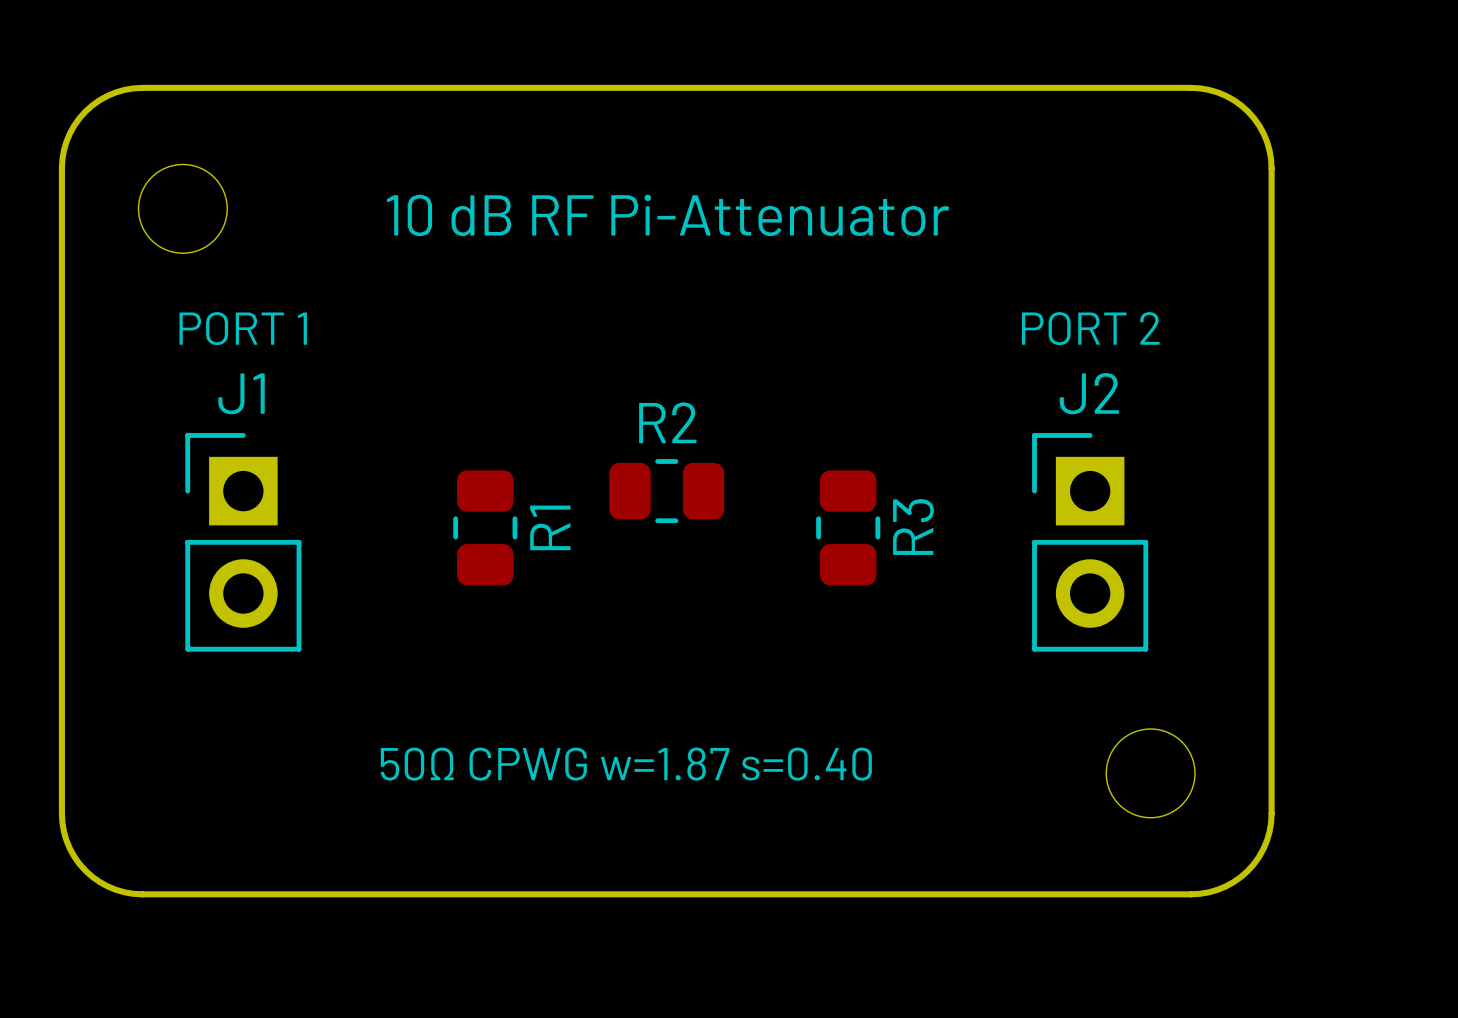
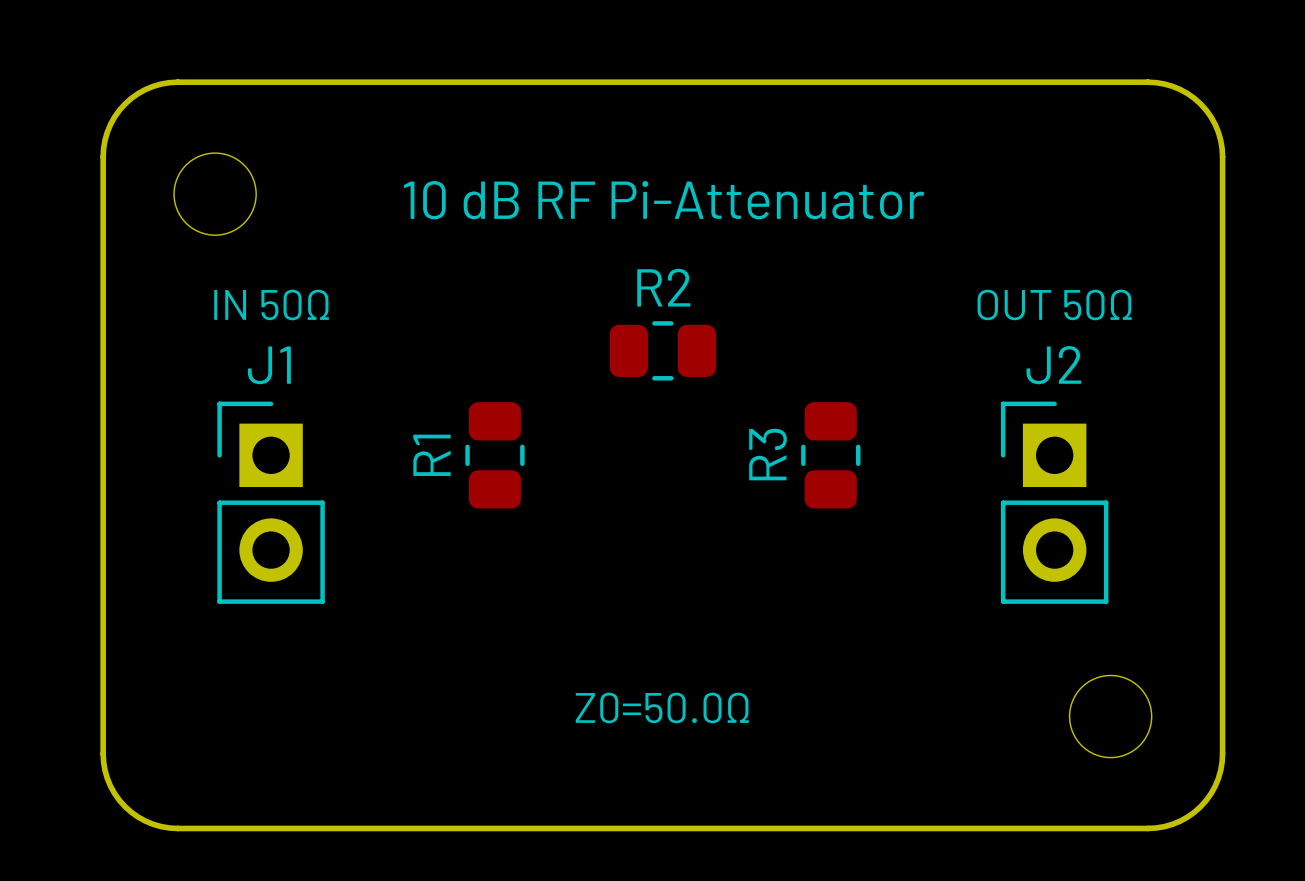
text: PORT 1 (243, 328) -> IN 50Ω (271, 304)
text: PORT 2 (1090, 328) -> OUT 50Ω (1054, 304)
R2 position: (666, 491) -> (662, 350)
R1 position: (485, 527) -> (494, 455)
R1 name position: R1 (550, 527) -> R1 (432, 455)
R3 position: (848, 527) -> (830, 455)
R3 name position: R3 (913, 527) -> R3 (768, 454)
text: 50Ω CPWG w=1.87 s=0.40 (626, 764) -> Z0=50.0Ω (662, 707)

